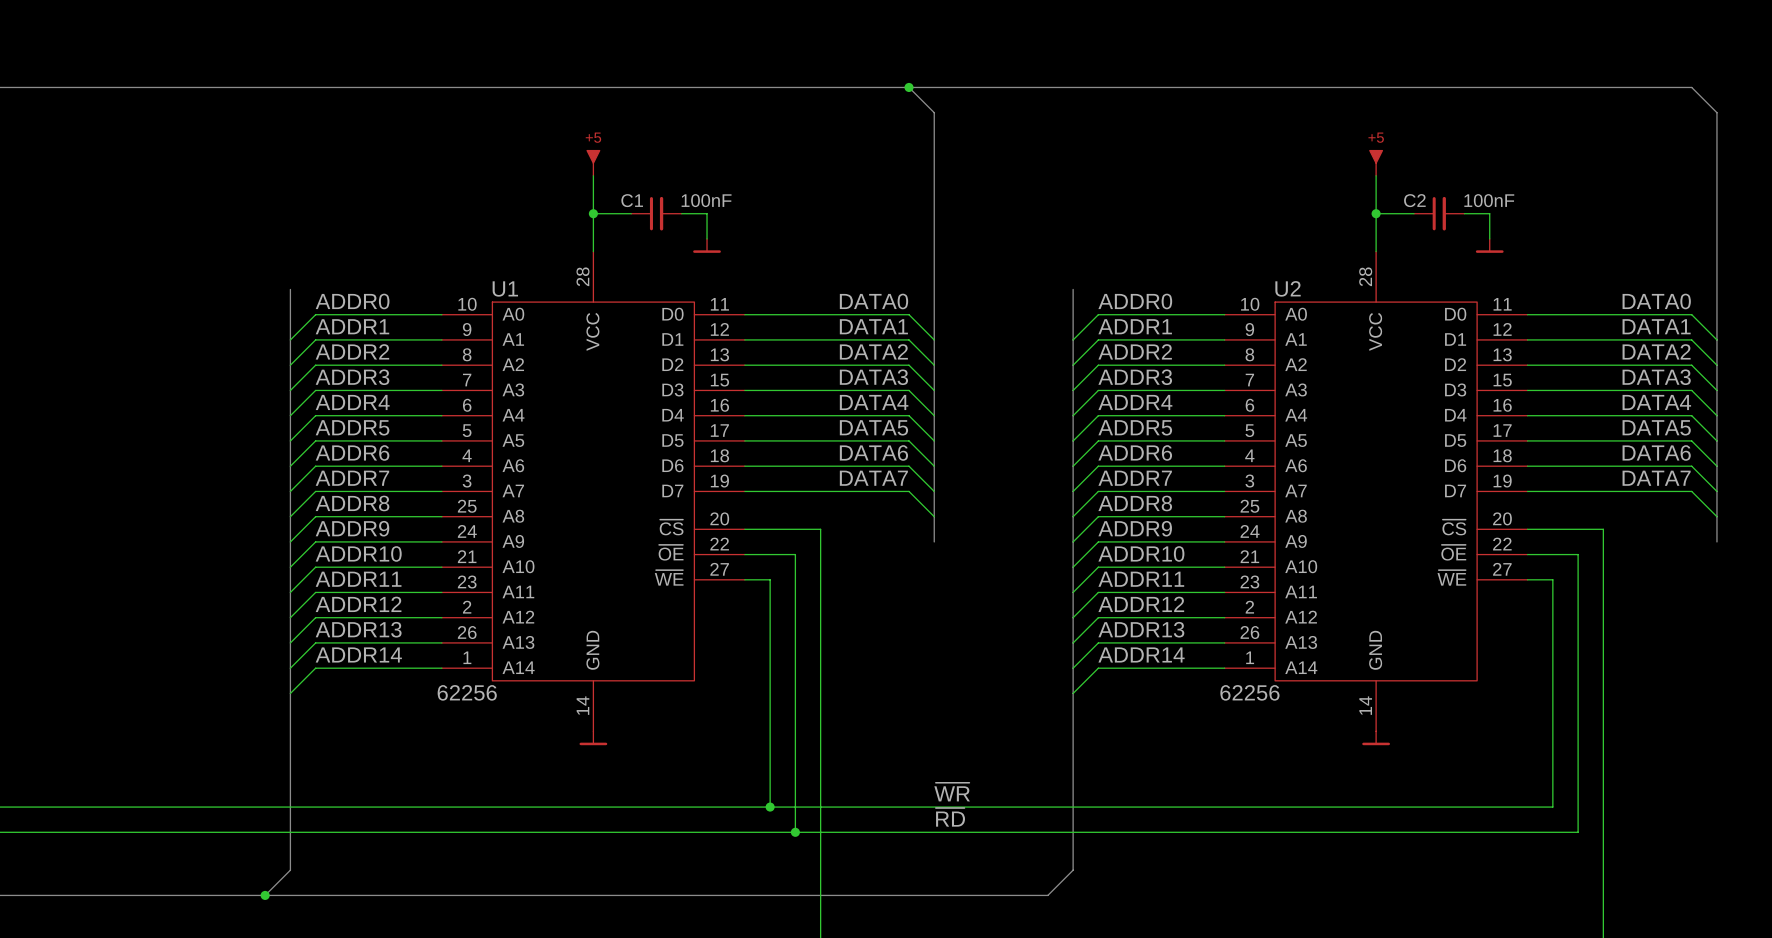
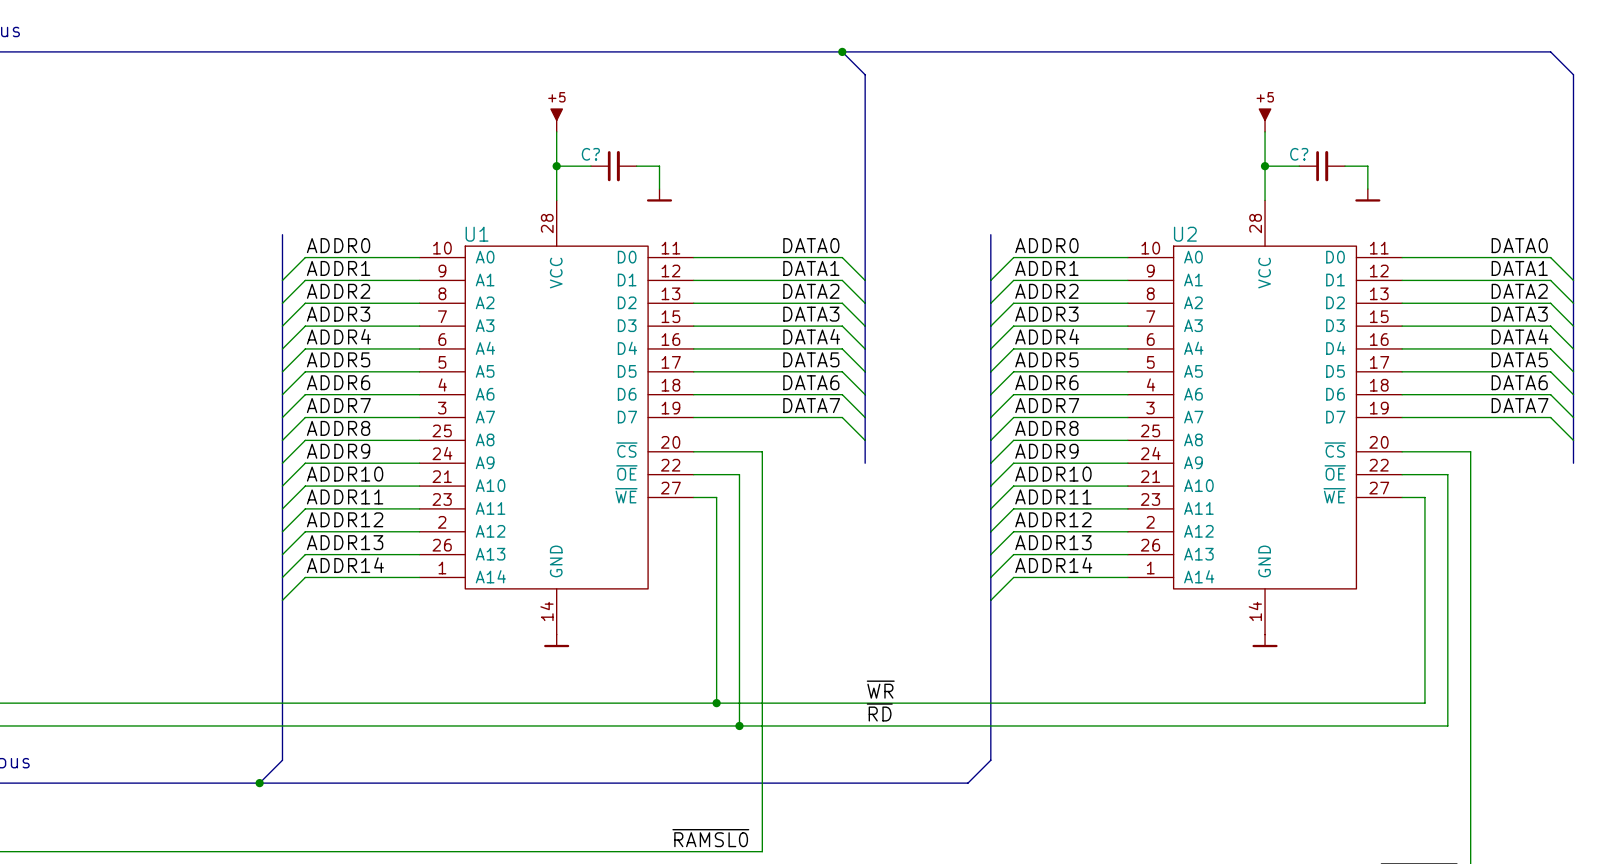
C1 name: C1 (632, 200) -> C? (590, 154)
C1 value: 100nF (706, 200) -> none
C2 name: C2 (1414, 200) -> C? (1299, 154)
C2 value: 100nF (1489, 200) -> none
U1 value: 62256 (467, 692) -> none
U2 value: 62256 (1249, 692) -> none

